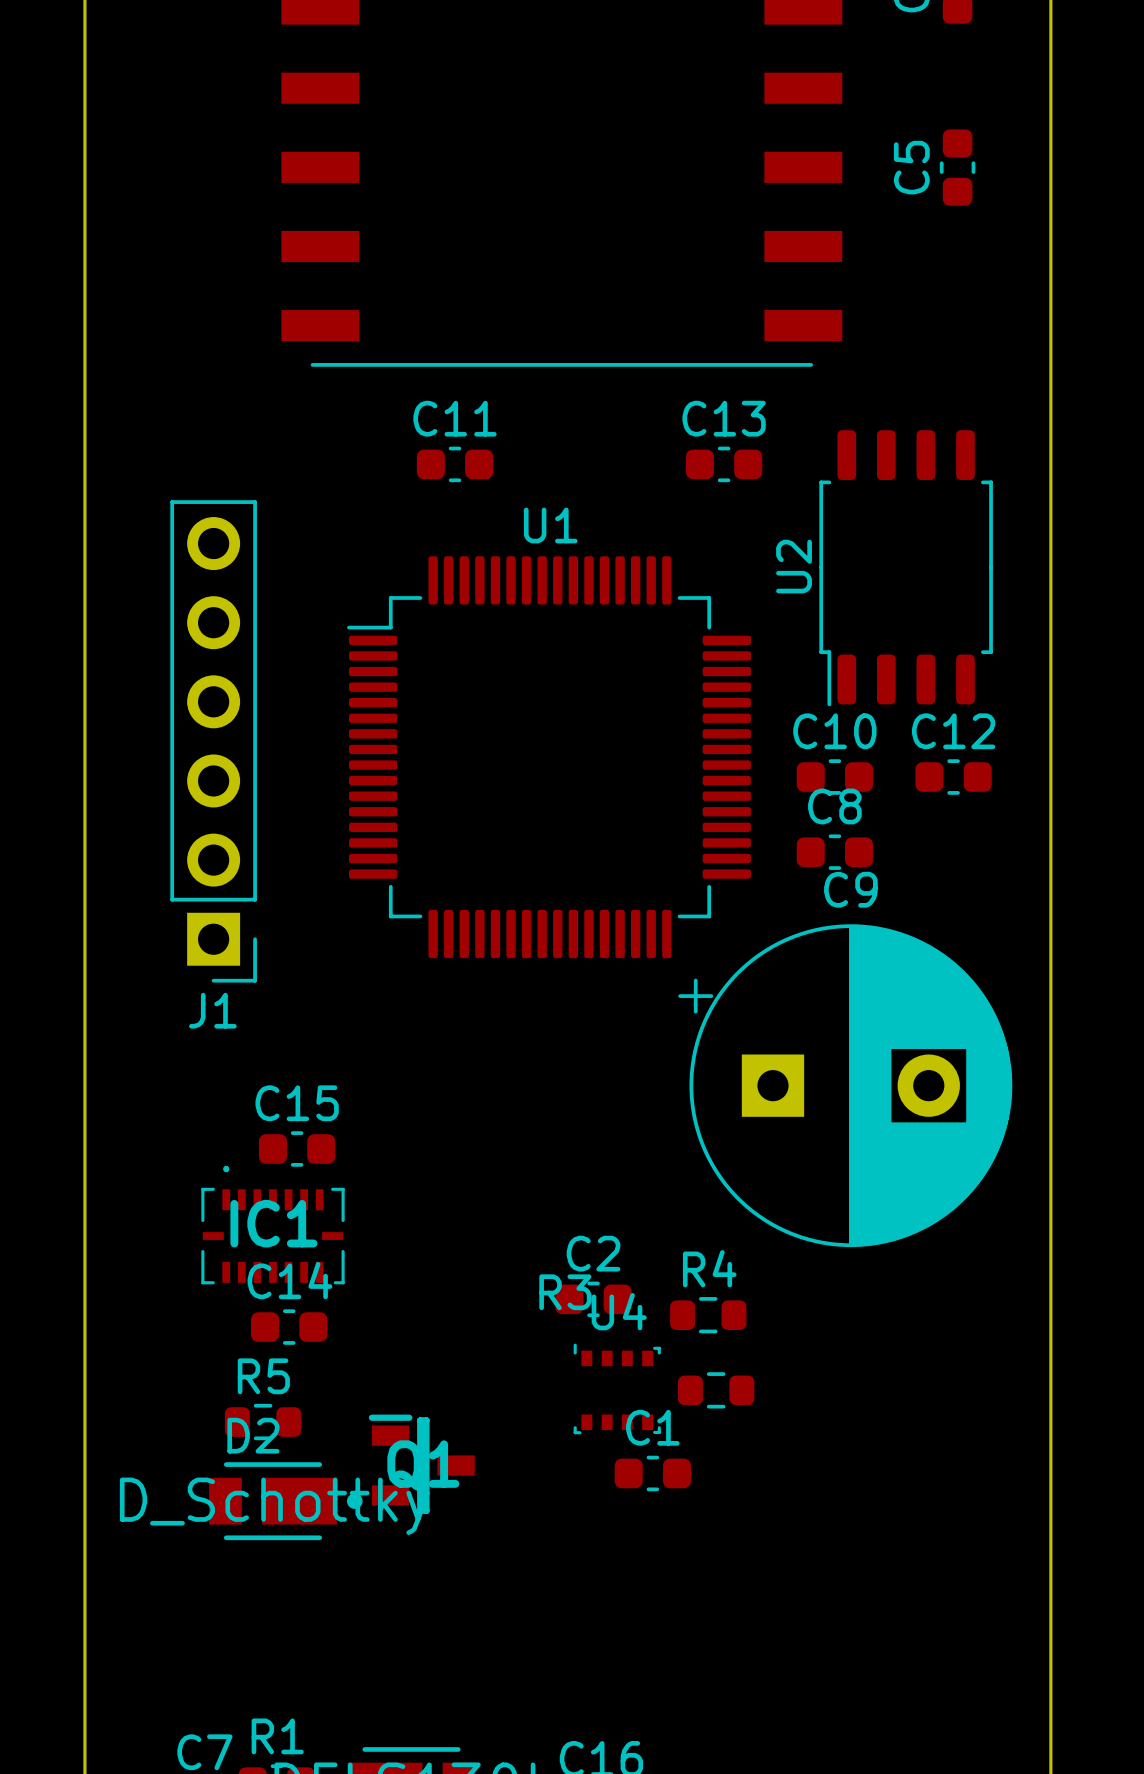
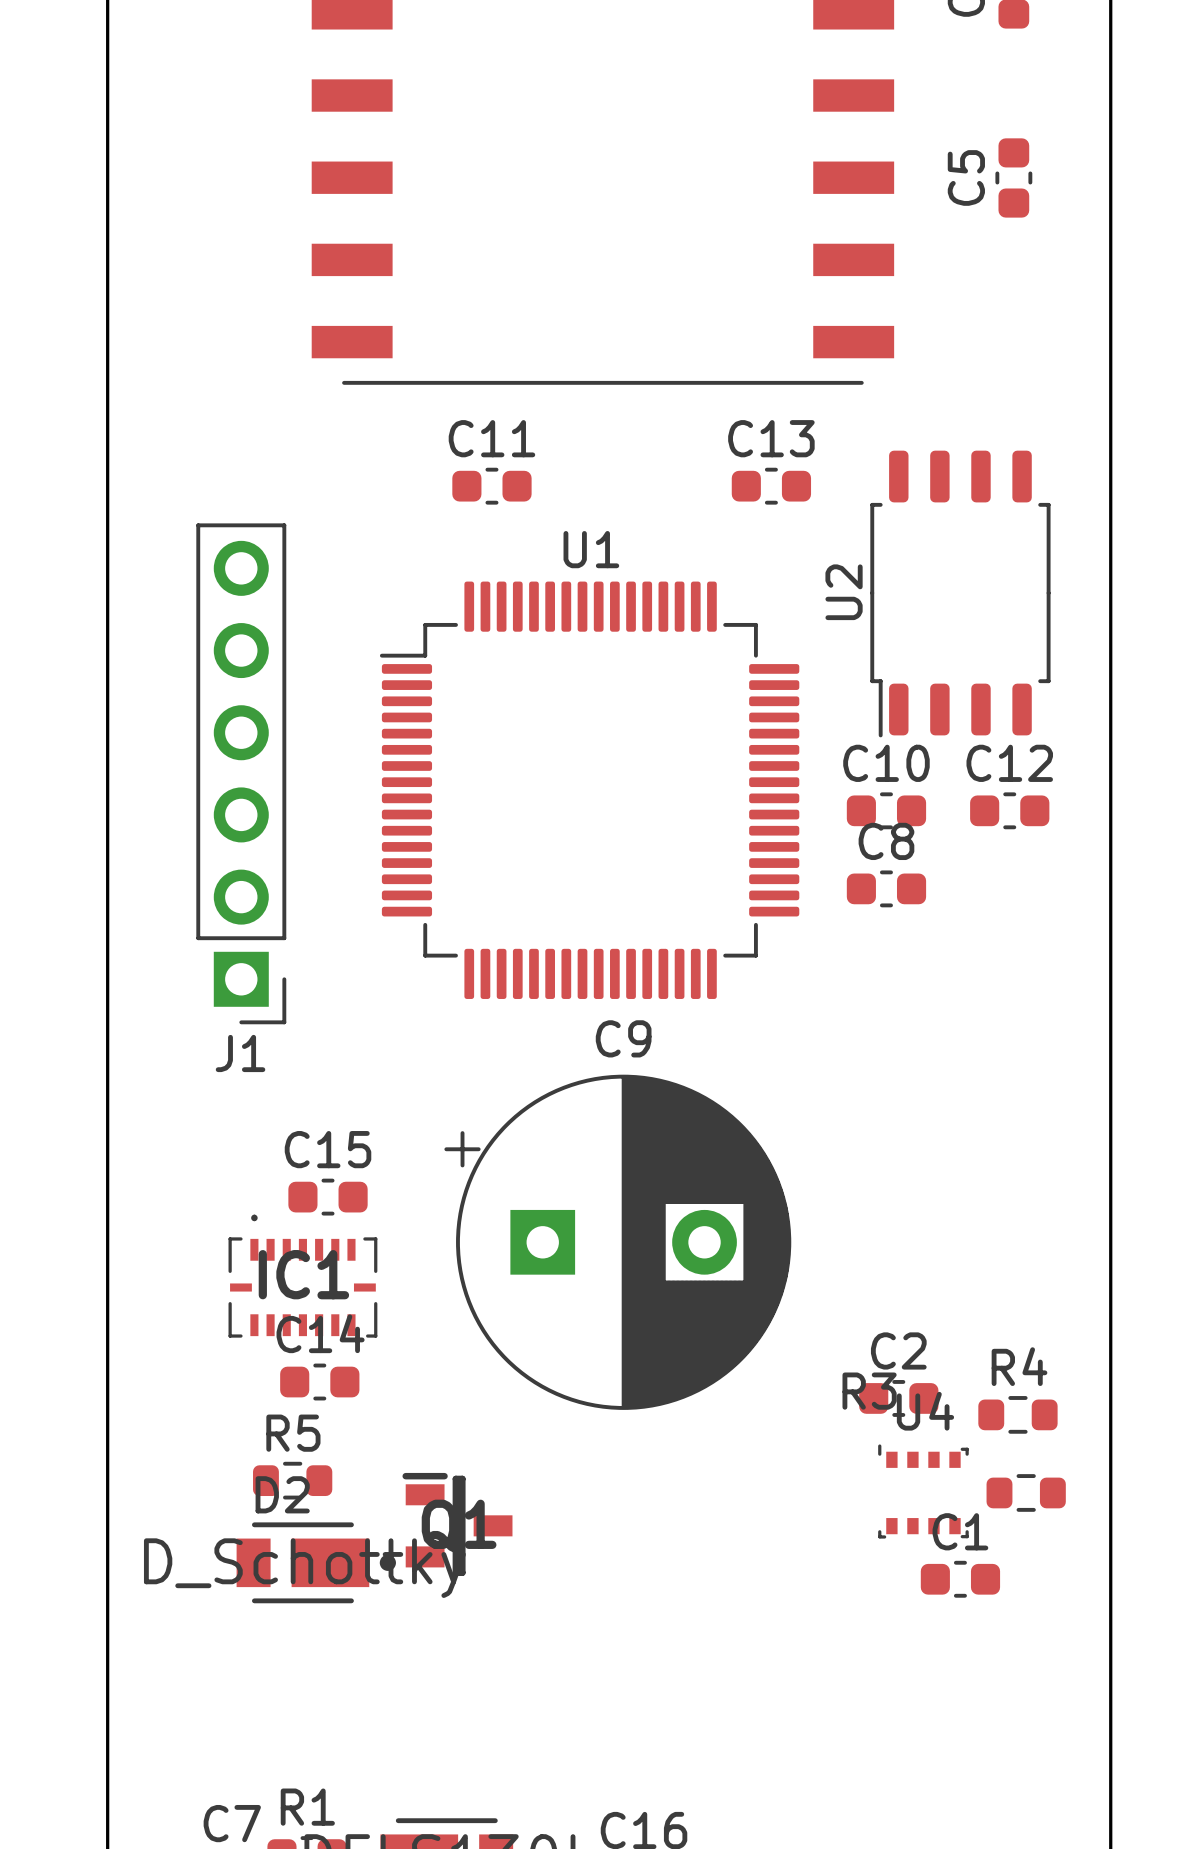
C9 position: (845, 1085) -> (617, 1242)
C2 position: (593, 1299) -> (898, 1398)
R4 position: (708, 1315) -> (1017, 1414)
U4 position: (617, 1388) -> (923, 1491)
R3 position: (716, 1390) -> (1026, 1492)
C1 position: (652, 1473) -> (960, 1579)

